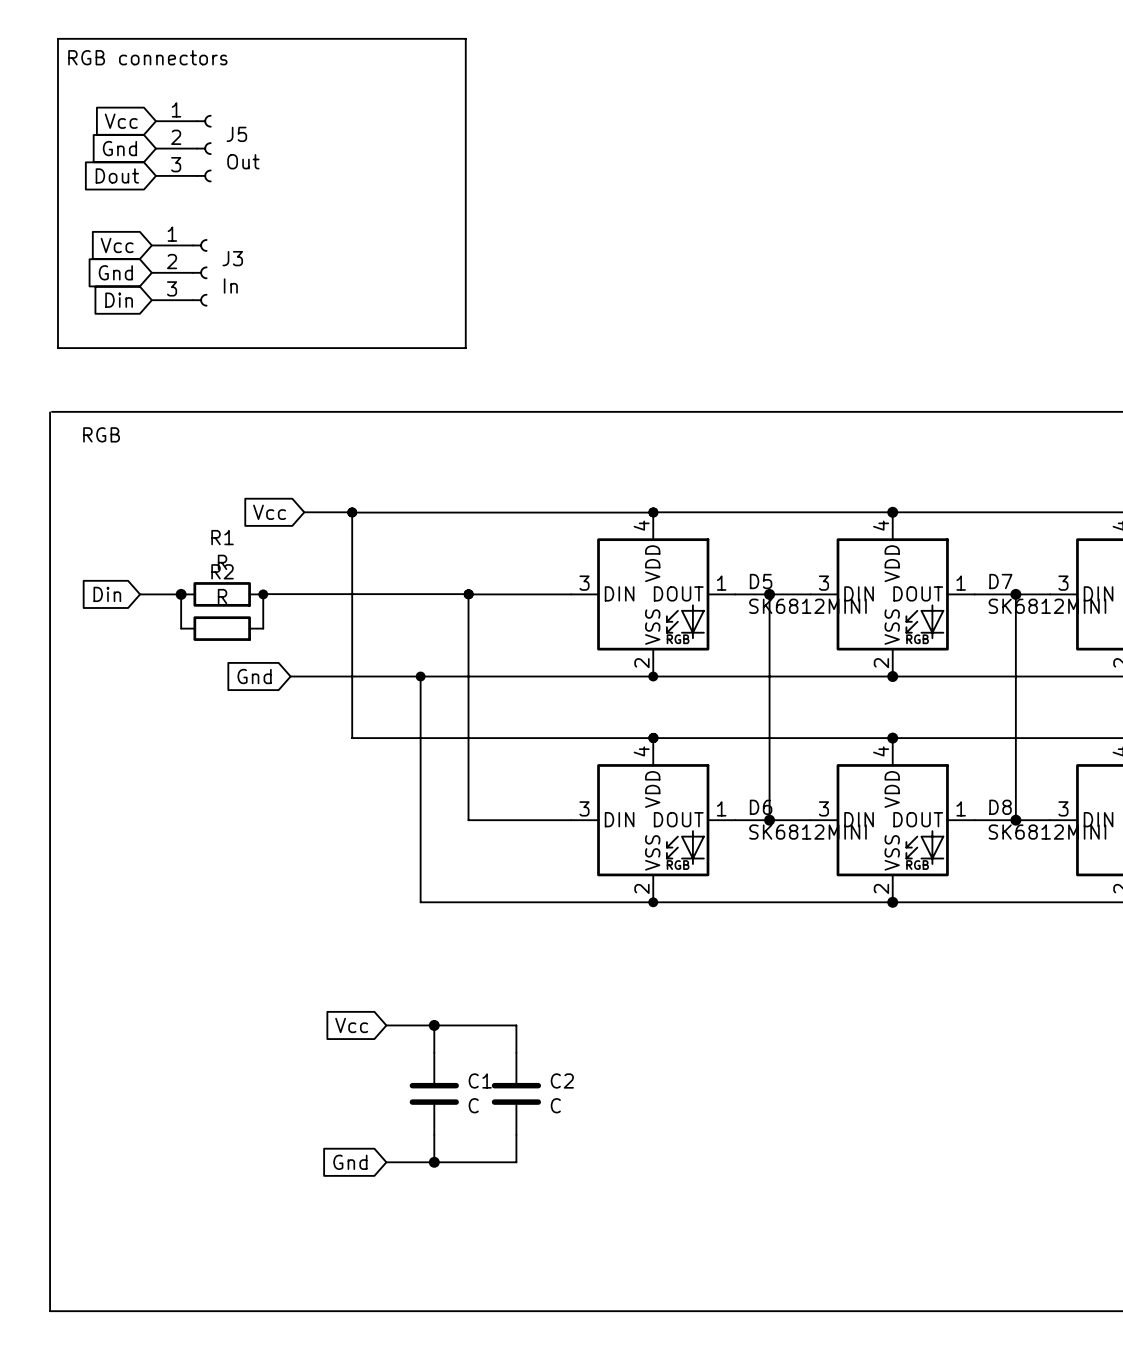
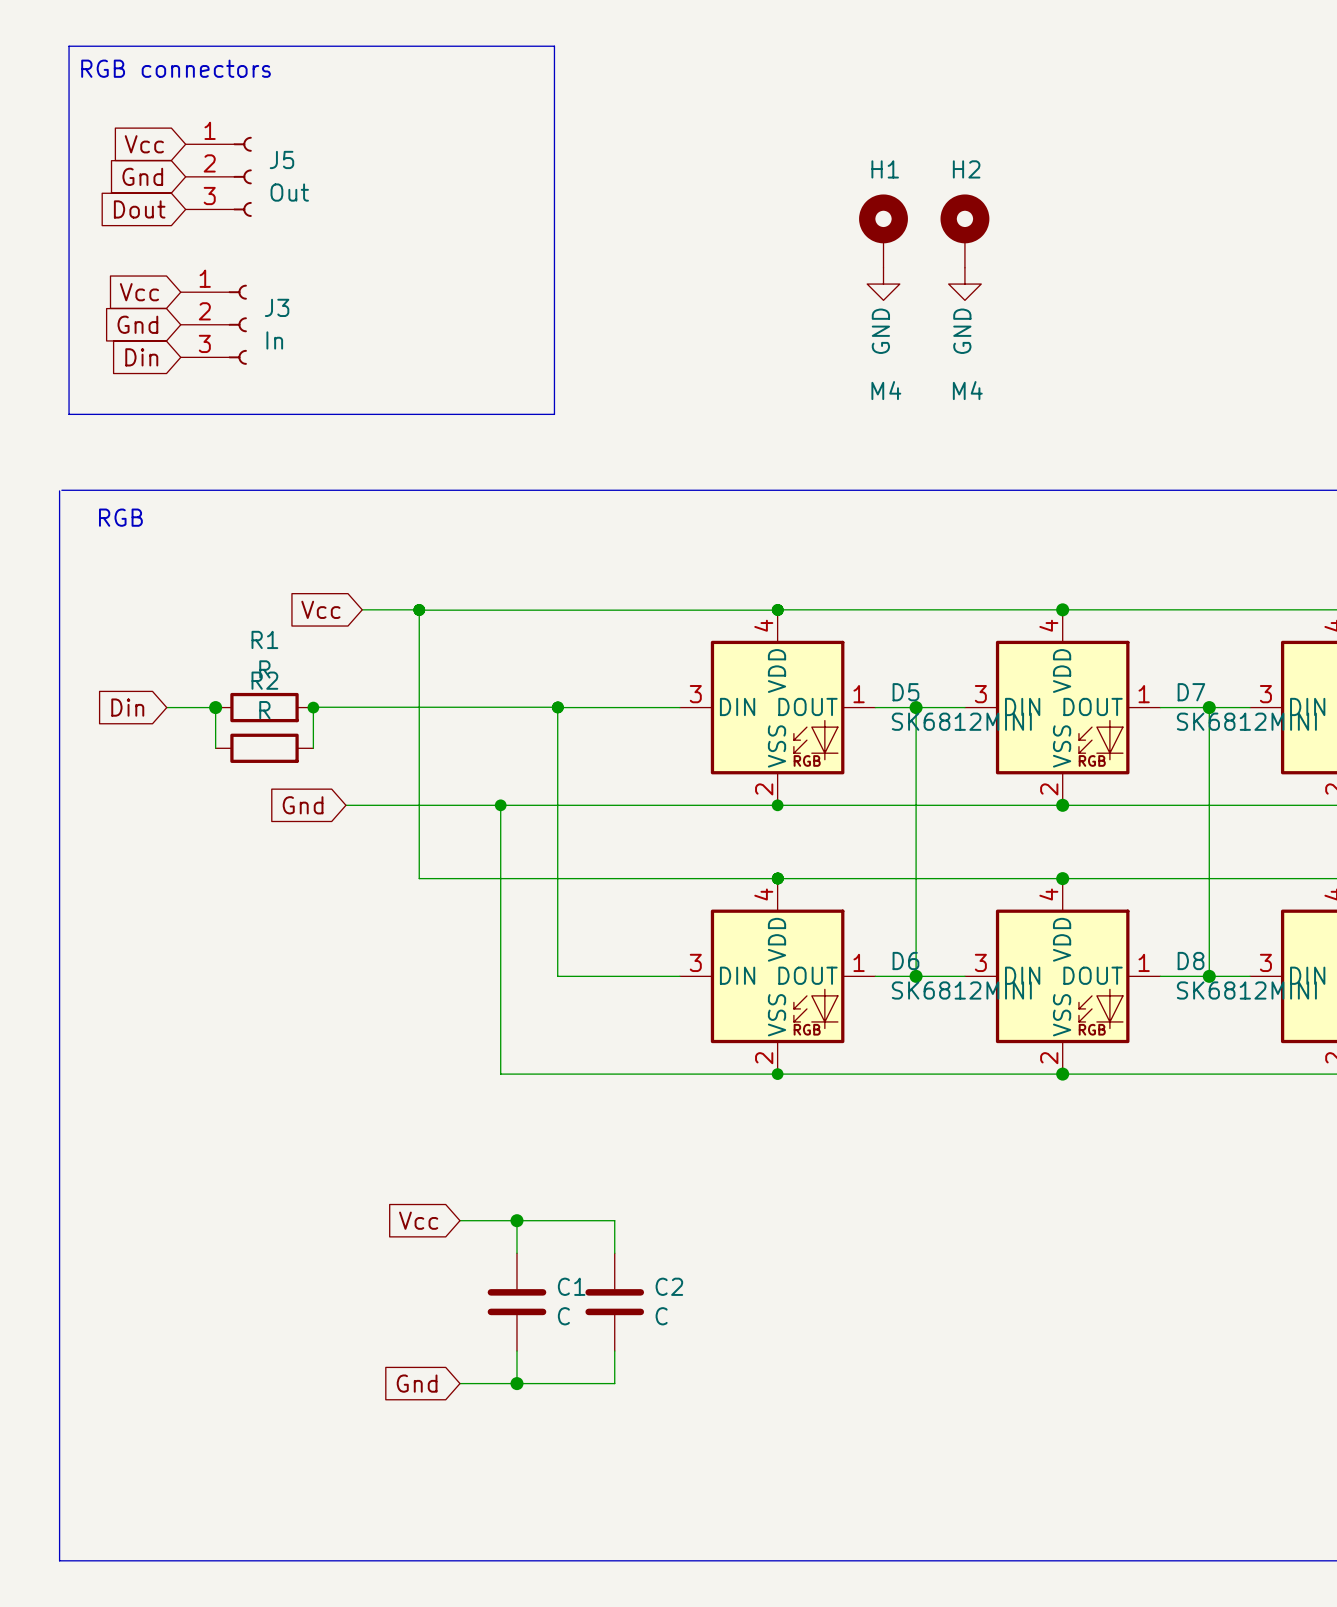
H1: none -> M4 (883, 231)
H2: none -> M4 (964, 231)
power symbol: none -> GND (883, 284)
power symbol: none -> GND (964, 284)

